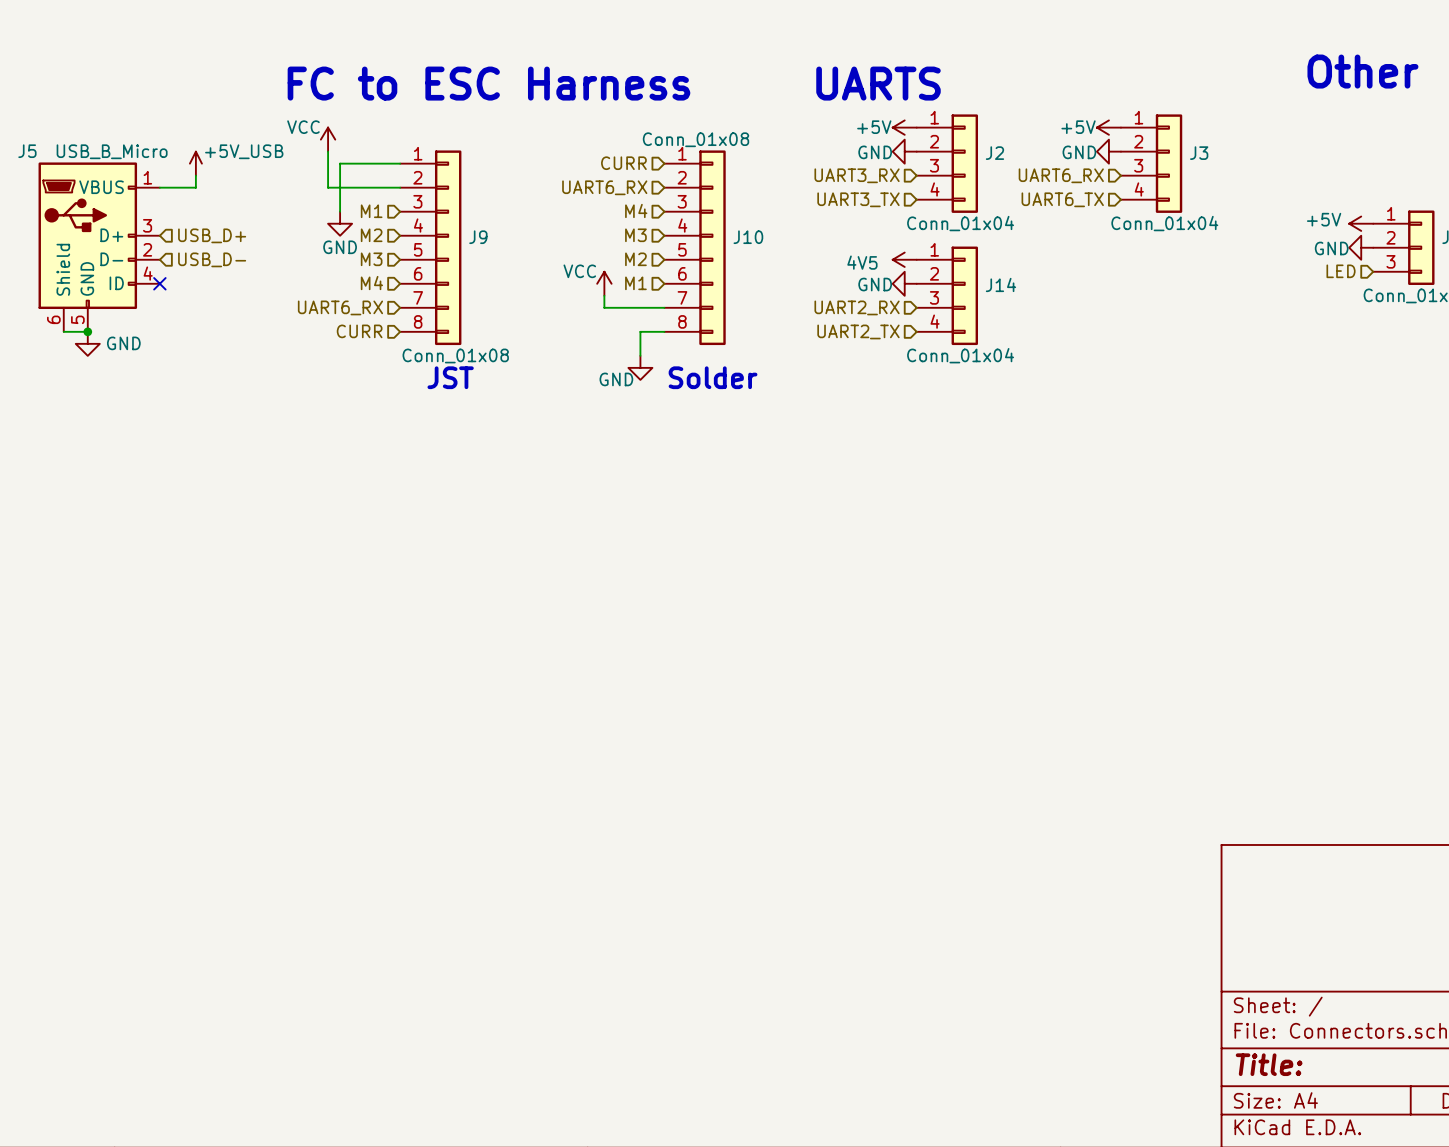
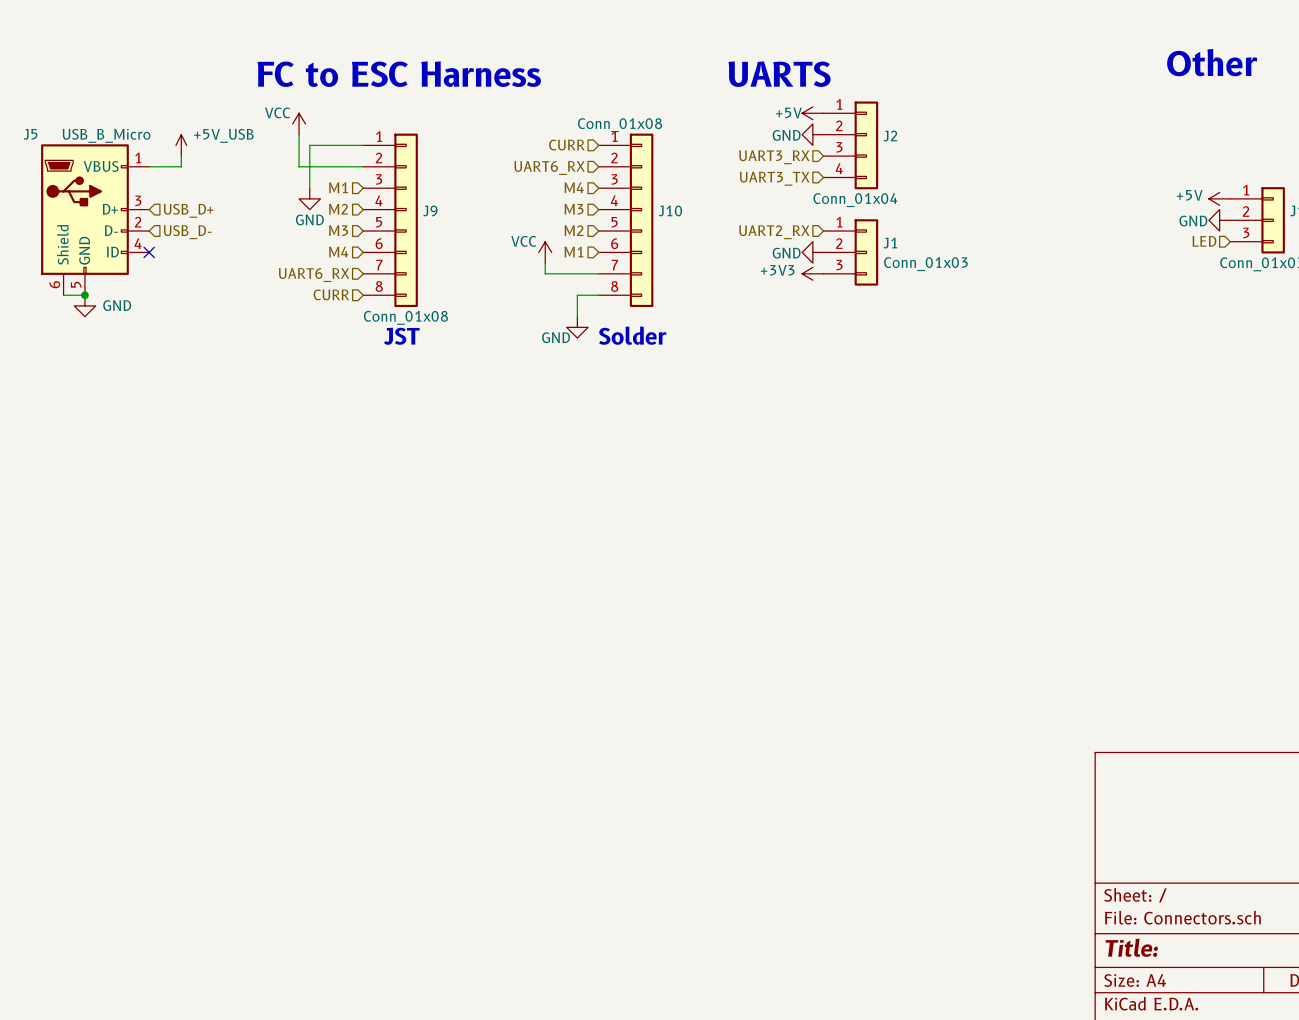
power symbol: +5V (1108, 127) -> none
power symbol: GND (1108, 151) -> none
J3: Conn_01x04 (1151, 163) -> none
hierarchical label: UART6_RX (1061, 175) -> none
hierarchical label: UART6_TX (1062, 199) -> none
power symbol: 4V5 (904, 259) -> none
J1: none -> Conn_01x03 (850, 252)
J14: Conn_01x04 (947, 295) -> none
hierarchical label position: UART2_RX (857, 307) -> UART2_RX (774, 232)
power symbol: none -> +3V3 (812, 273)
hierarchical label: UART2_TX (858, 331) -> none

